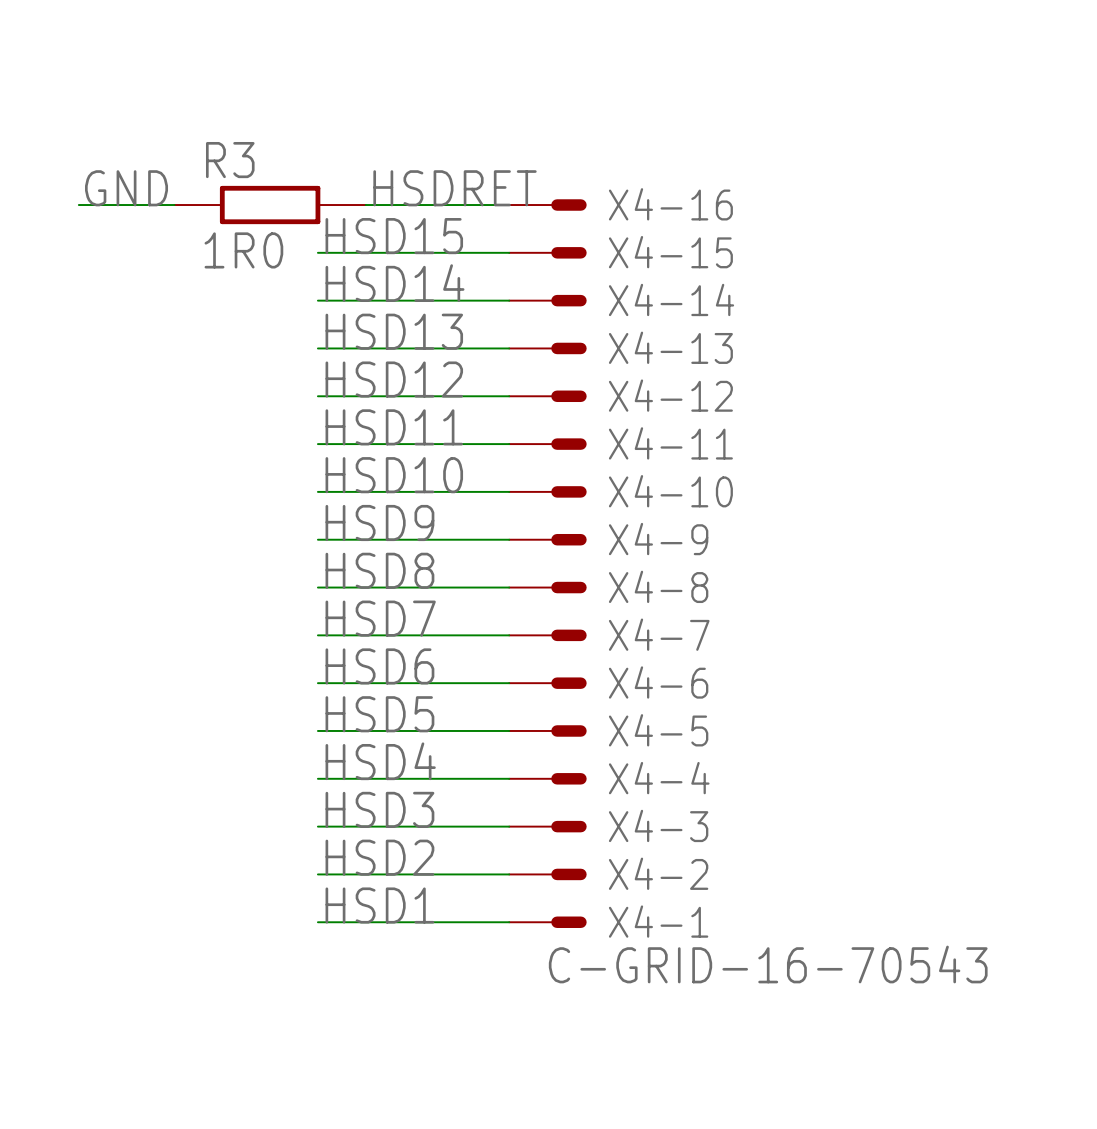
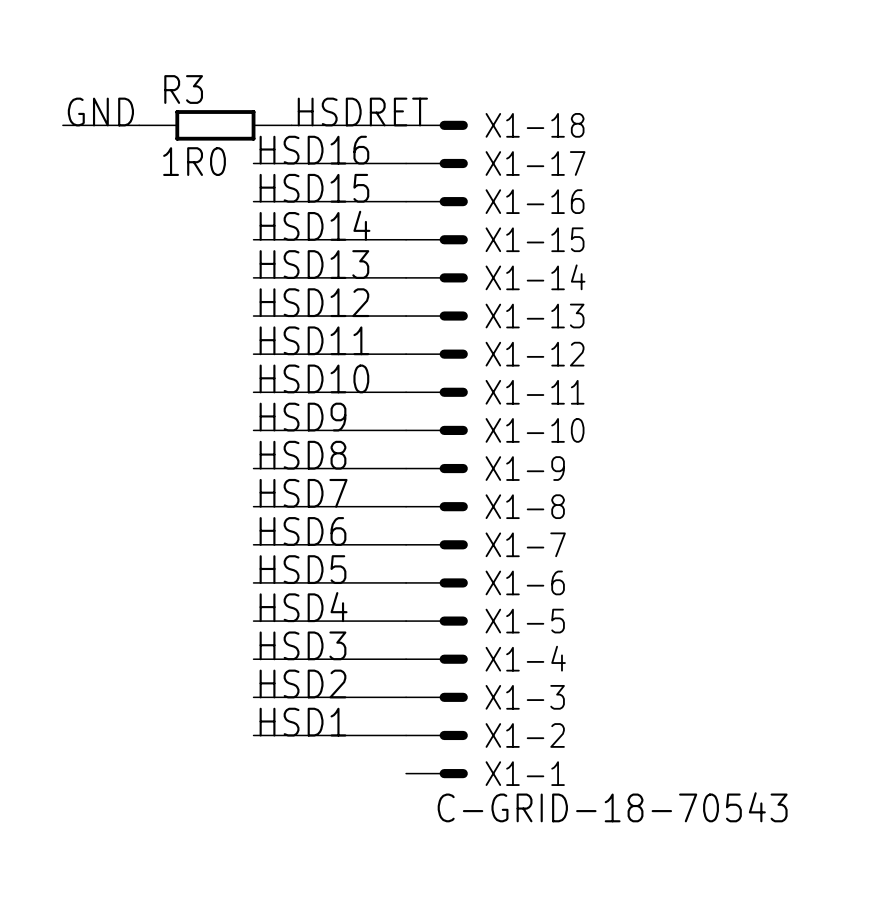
wire: none -> (291, 125) (406, 125)
X1-18: none -> (436, 125)
label position: GND (126, 188) -> GND (100, 112)
label: none -> HSD16 (314, 150)
label position: HSDRET (455, 188) -> HSDRET (362, 112)
X4-16 name: X4-16 (670, 204) -> X1-17 (535, 163)
wire: (78, 205) (174, 205) -> (62, 125) (139, 125)
R3 position: (270, 205) -> (215, 125)
X4-15 name: X4-15 (670, 252) -> X1-16 (535, 201)
X4-14 name: X4-14 (671, 299) -> X1-15 (535, 239)
X4-13 name: X4-13 (670, 347) -> X1-14 (535, 277)
X4-12 name: X4-12 (670, 395) -> X1-13 (535, 316)
X4-11 name: X4-11 (670, 443) -> X1-12 (535, 354)
X4-10 name: X4-10 (670, 491) -> X1-11 (535, 392)
X4-9 name: X4-9 (658, 539) -> X1-10 (535, 430)
X4-8 name: X4-8 (658, 586) -> X1-9 (525, 468)
X4-7 name: X4-7 (659, 634) -> X1-8 (525, 506)
X4-6 name: X4-6 (658, 682) -> X1-7 (525, 544)
X4-5 name: X4-5 (658, 730) -> X1-6 (525, 582)
X4-4 name: X4-4 (659, 778) -> X1-5 (525, 621)
X4-3 name: X4-3 (658, 825) -> X1-4 (525, 658)
X4-2 name: X4-2 (658, 873) -> X1-3 (525, 697)
X4-1 name: X4-1 (658, 921) -> X1-2 (525, 735)
X4-1 value: C-GRID-16-70543 (768, 964) -> none
X1-1: none -> C-GRID-18-70543 (436, 773)

